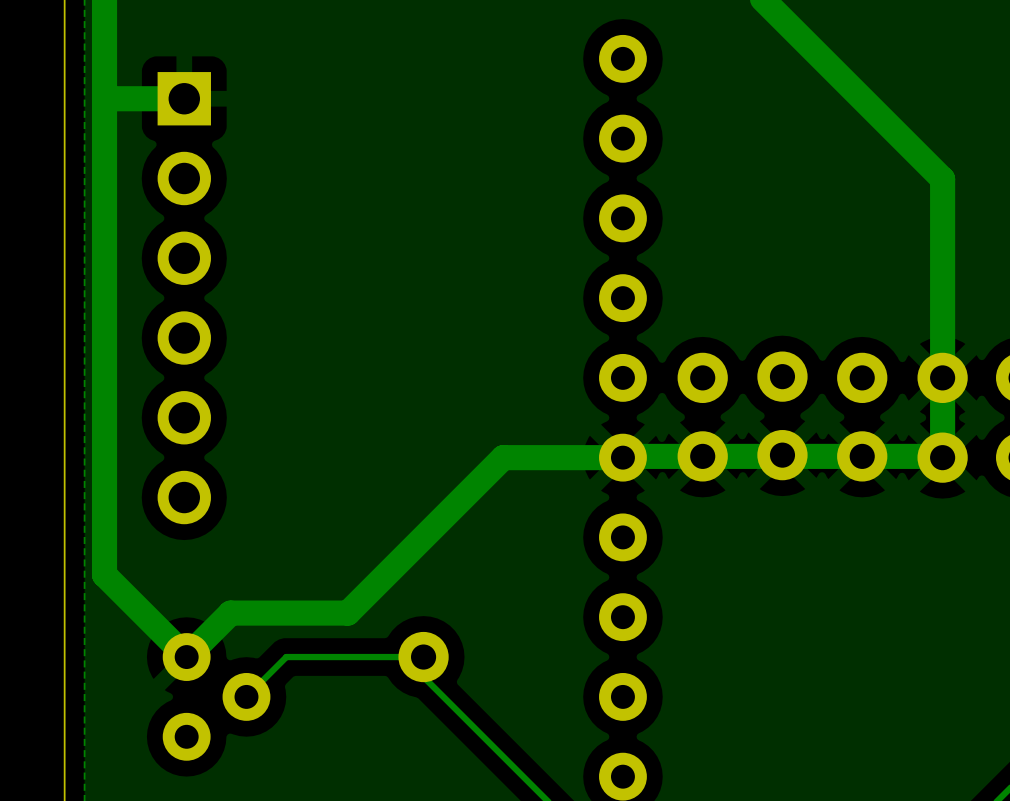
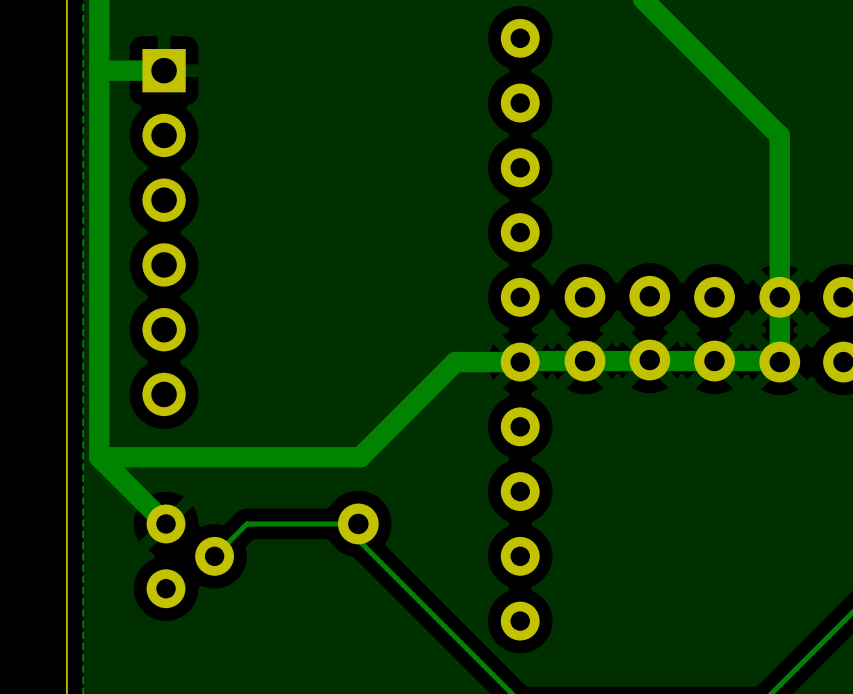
track: (543, 457) (503, 457) (347, 613) (230, 613) (186, 657) -> (455, 362) (360, 457) (99, 457)

